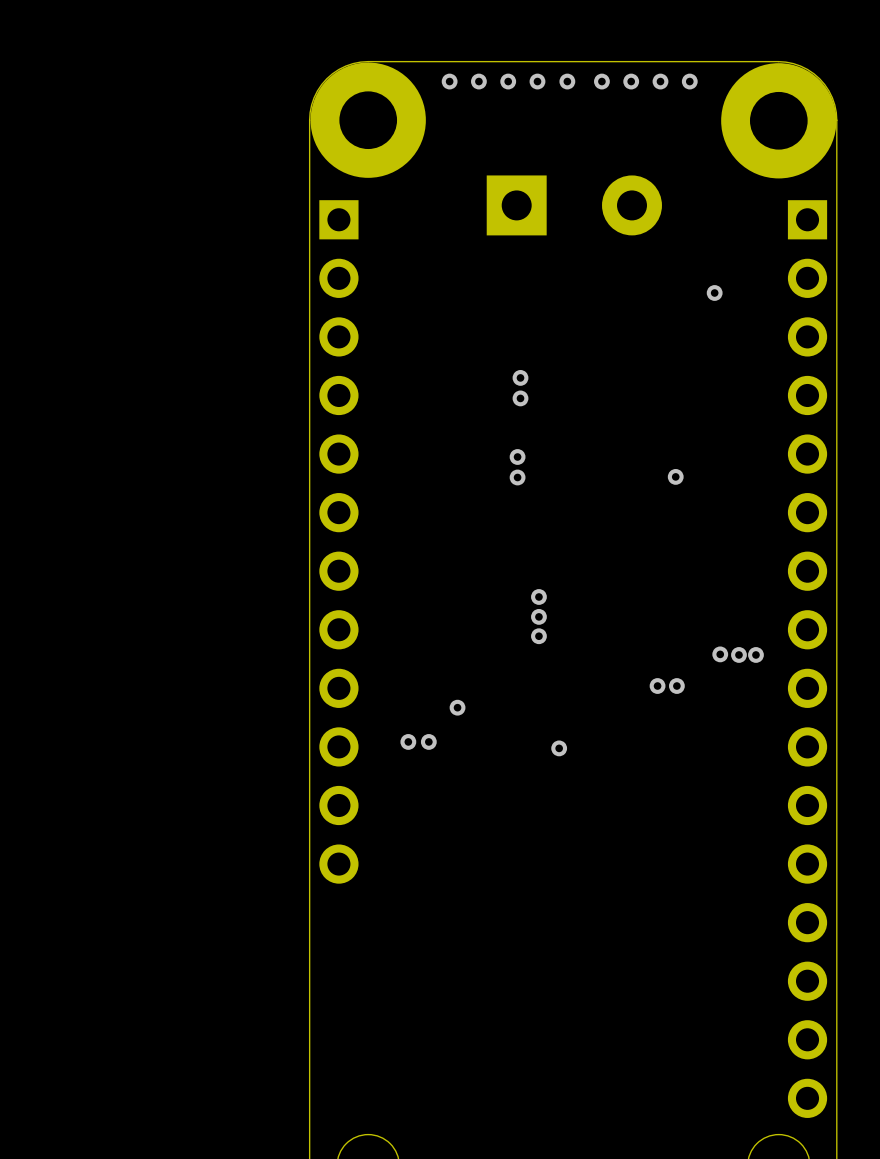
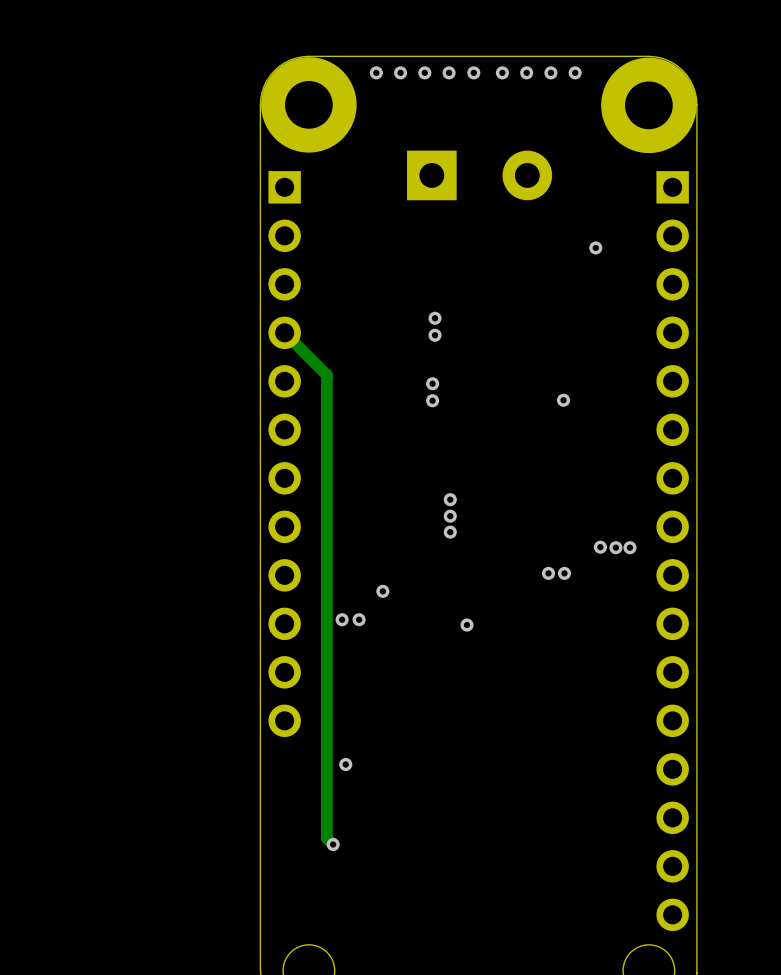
track: none -> (284, 332) (326, 375) (326, 838) (333, 844)
via: none -> (345, 764)
via: none -> (333, 844)

